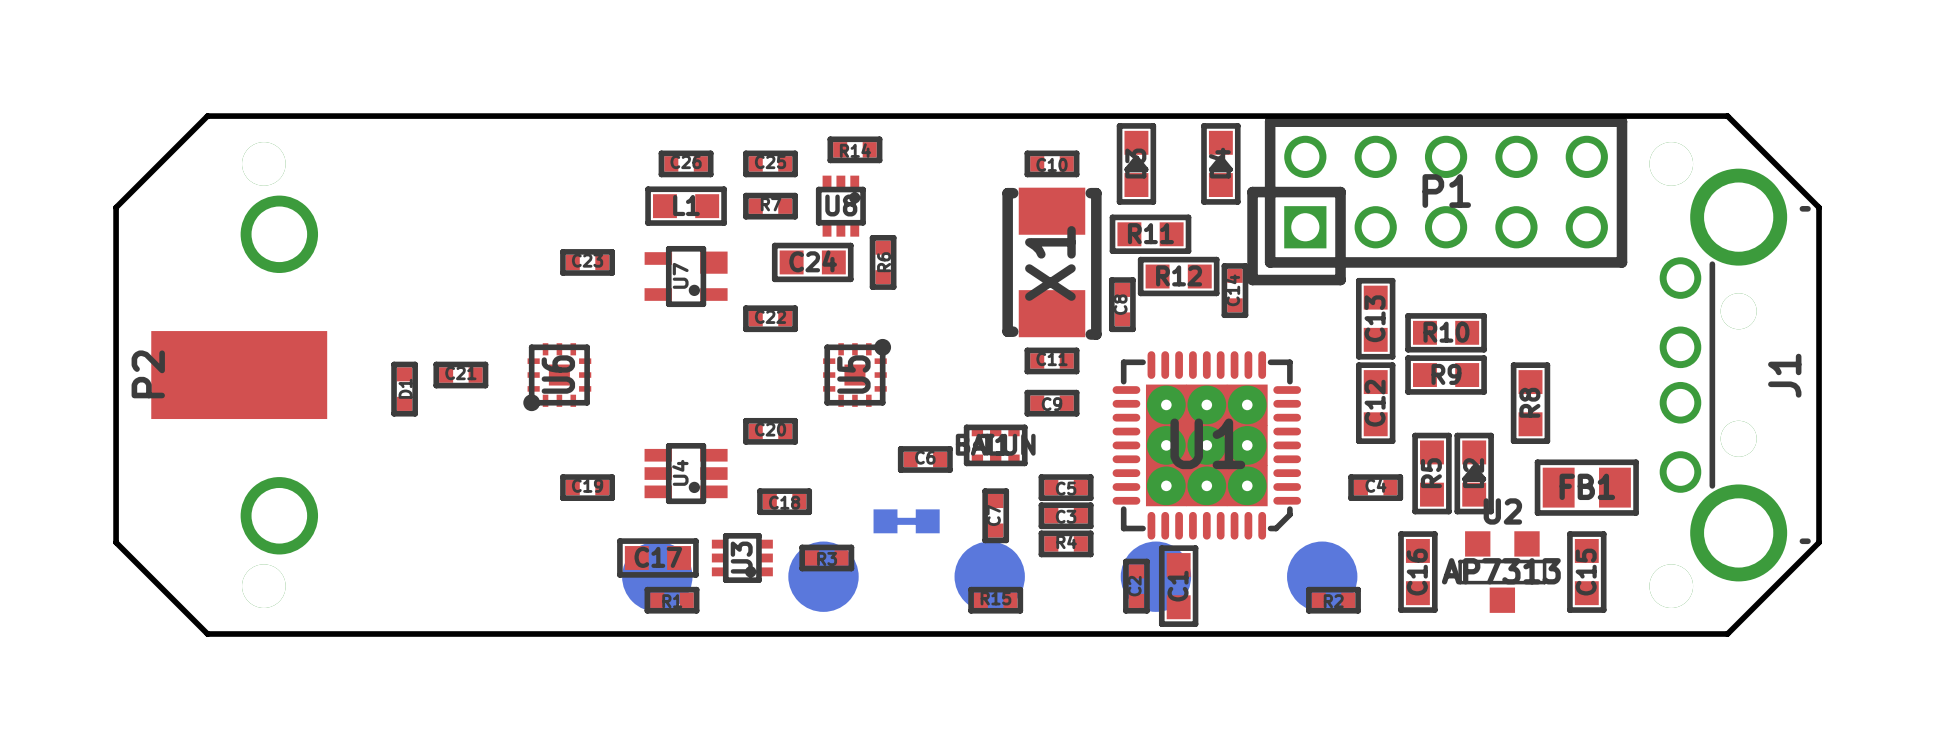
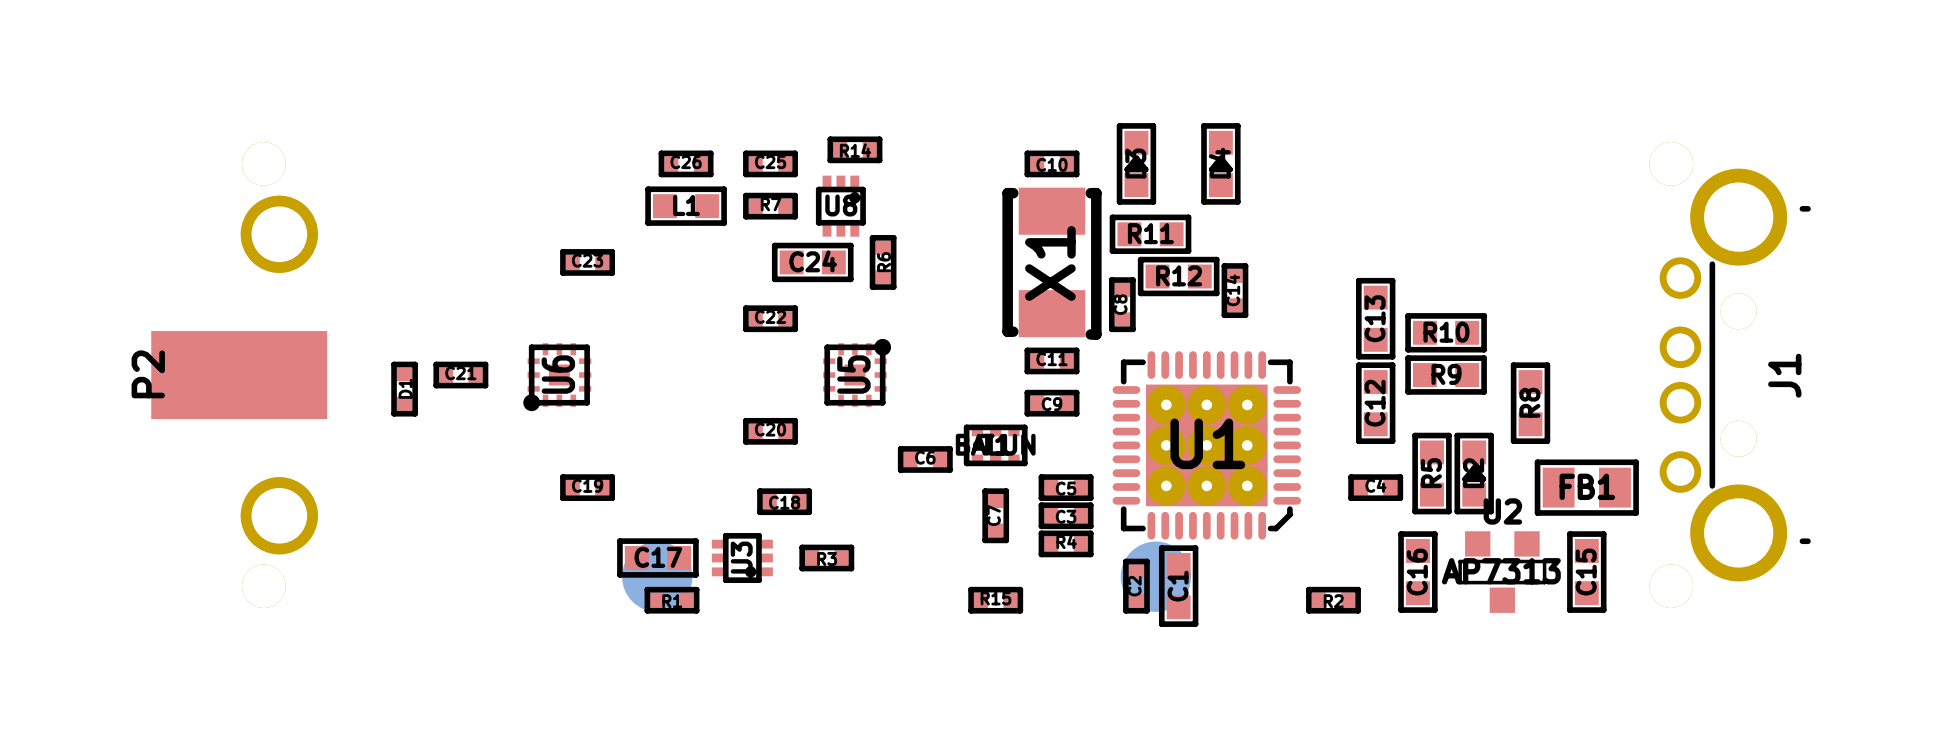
board edge: (207, 116) (1727, 116) (1819, 207) (1819, 542) (1727, 633) (207, 633) (116, 542) (116, 207) (207, 116) -> none
P1: (1437, 200) -> none
U7: (686, 276) -> none
U4: (686, 473) -> none
part: (906, 521) -> none
part: (823, 576) -> none
part: (989, 576) -> none
part: (1322, 576) -> none

